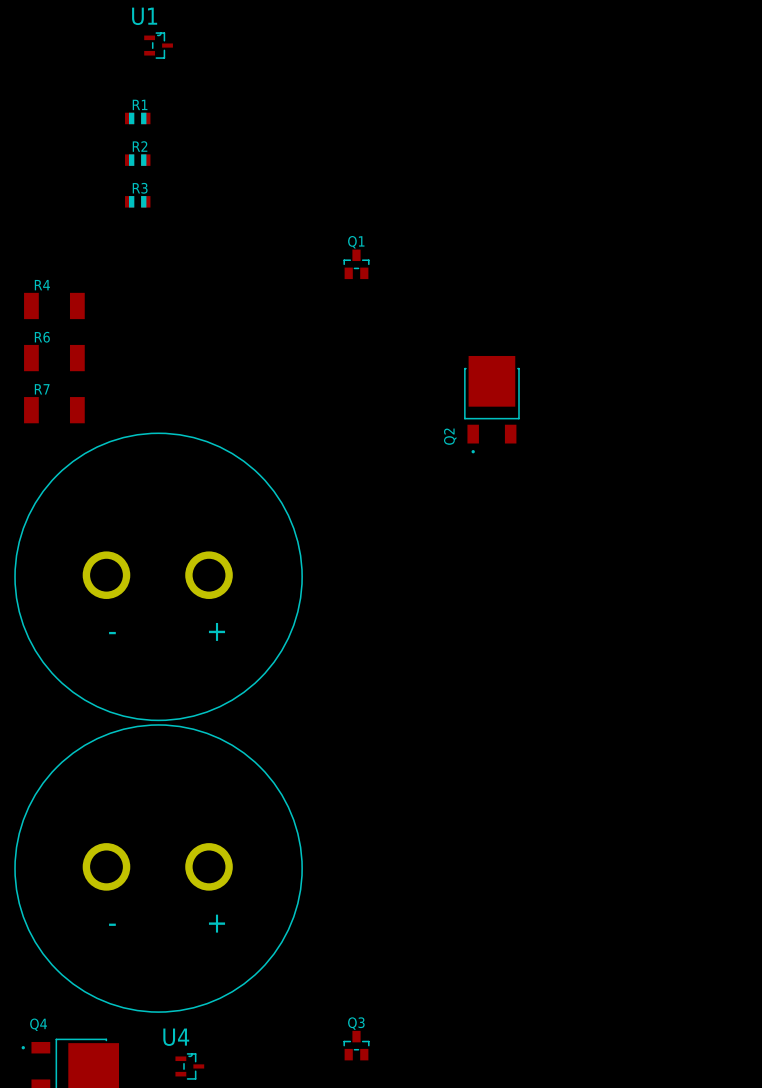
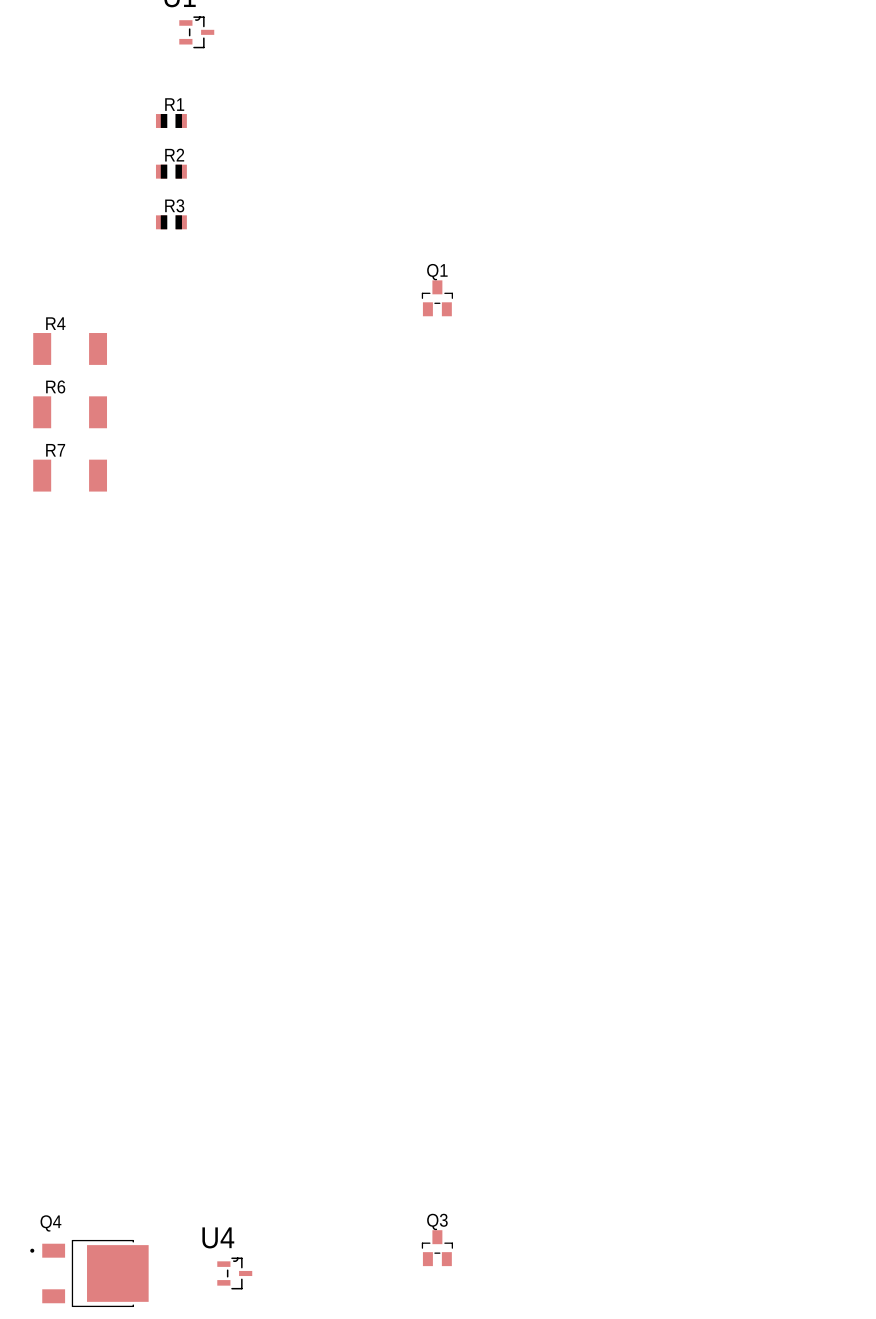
Q2: (491, 404) -> none
part: (158, 576) -> none
part: (158, 868) -> none

